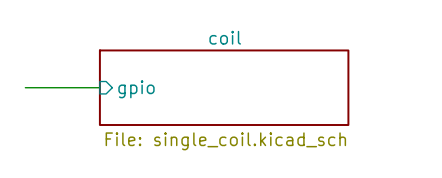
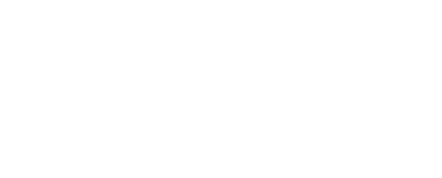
wire: (25, 87) (99, 87) -> none
sheet coil: File: single_coil.kicad_sch (224, 87) -> none
sheet pin: gpio (136, 89) -> none

